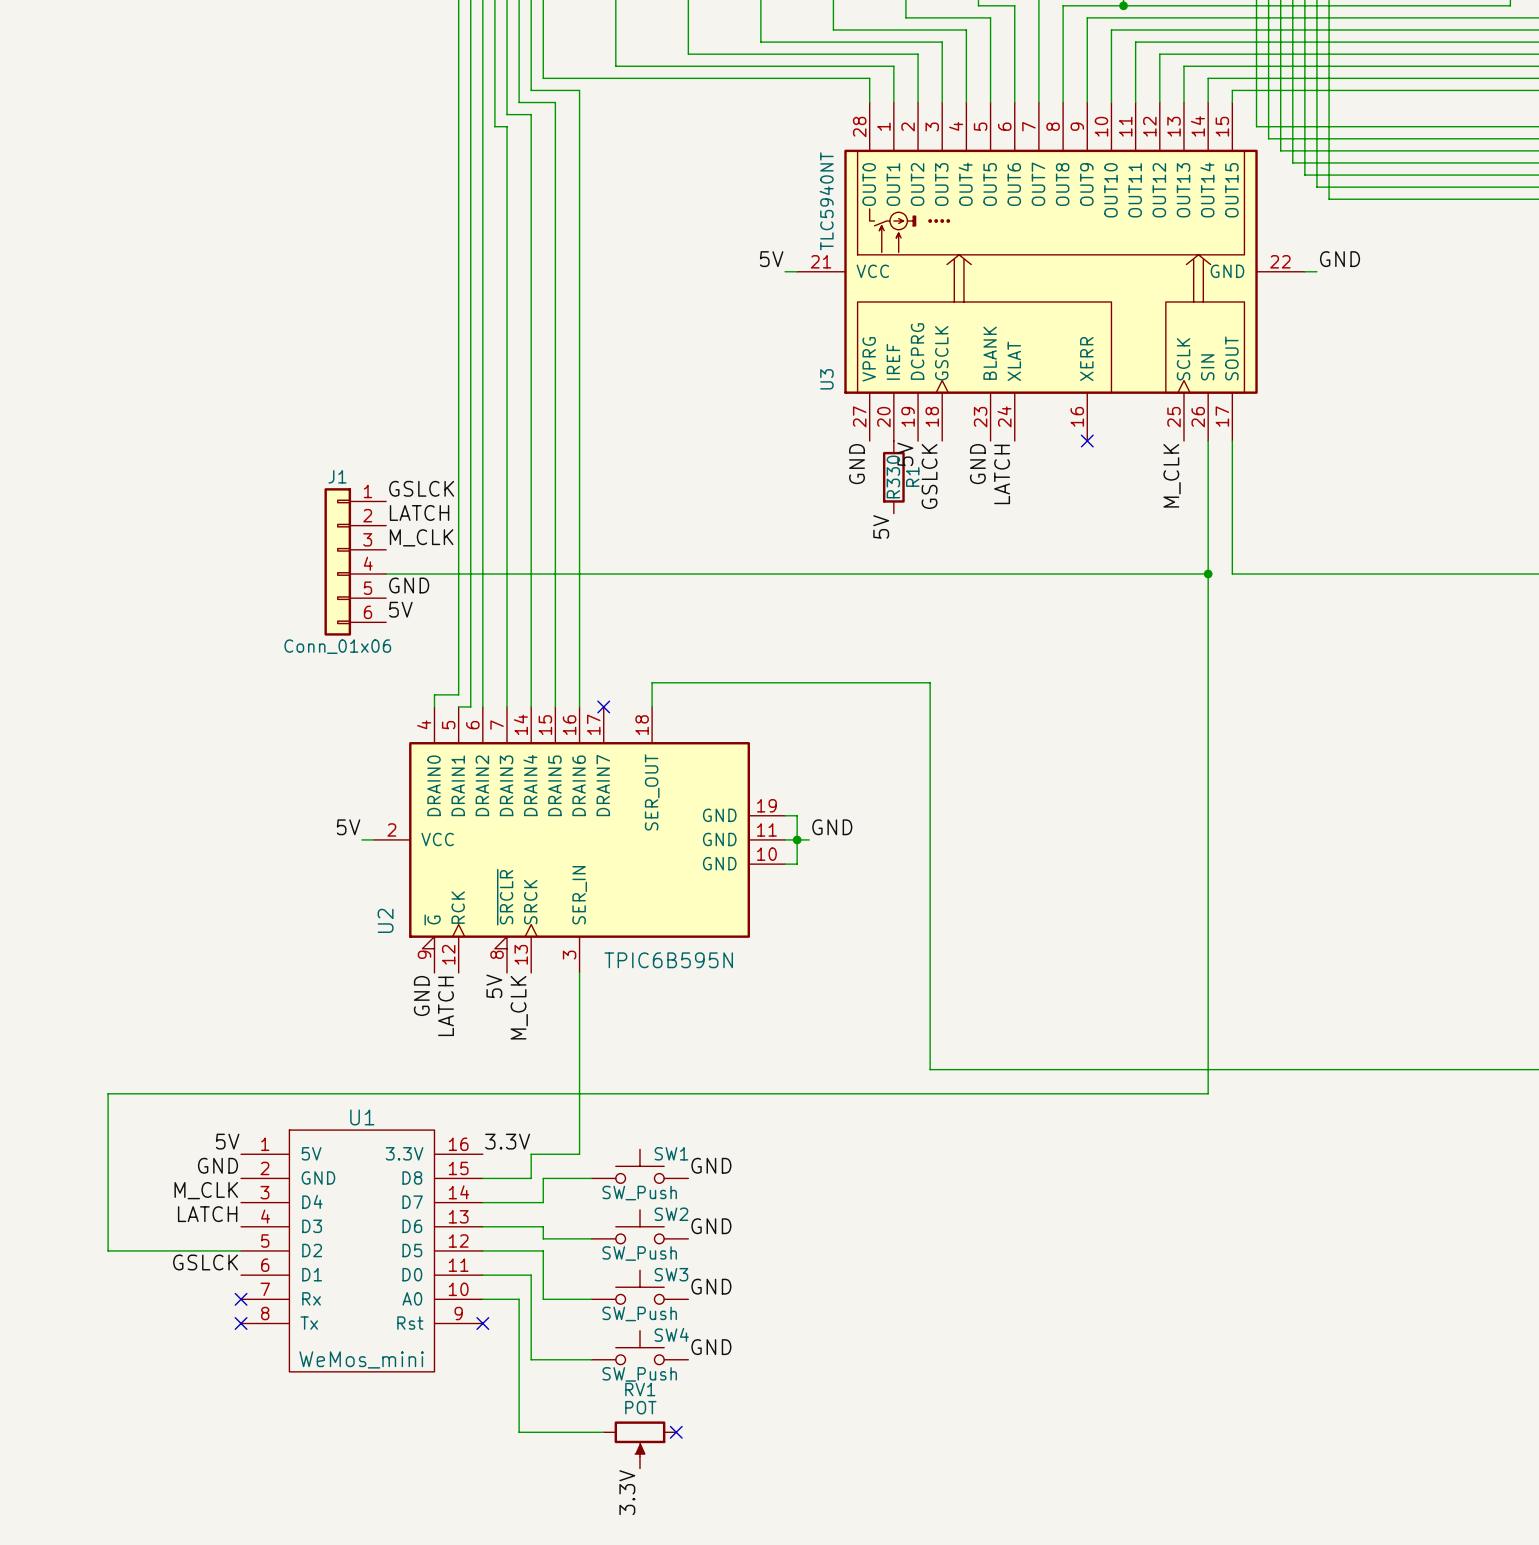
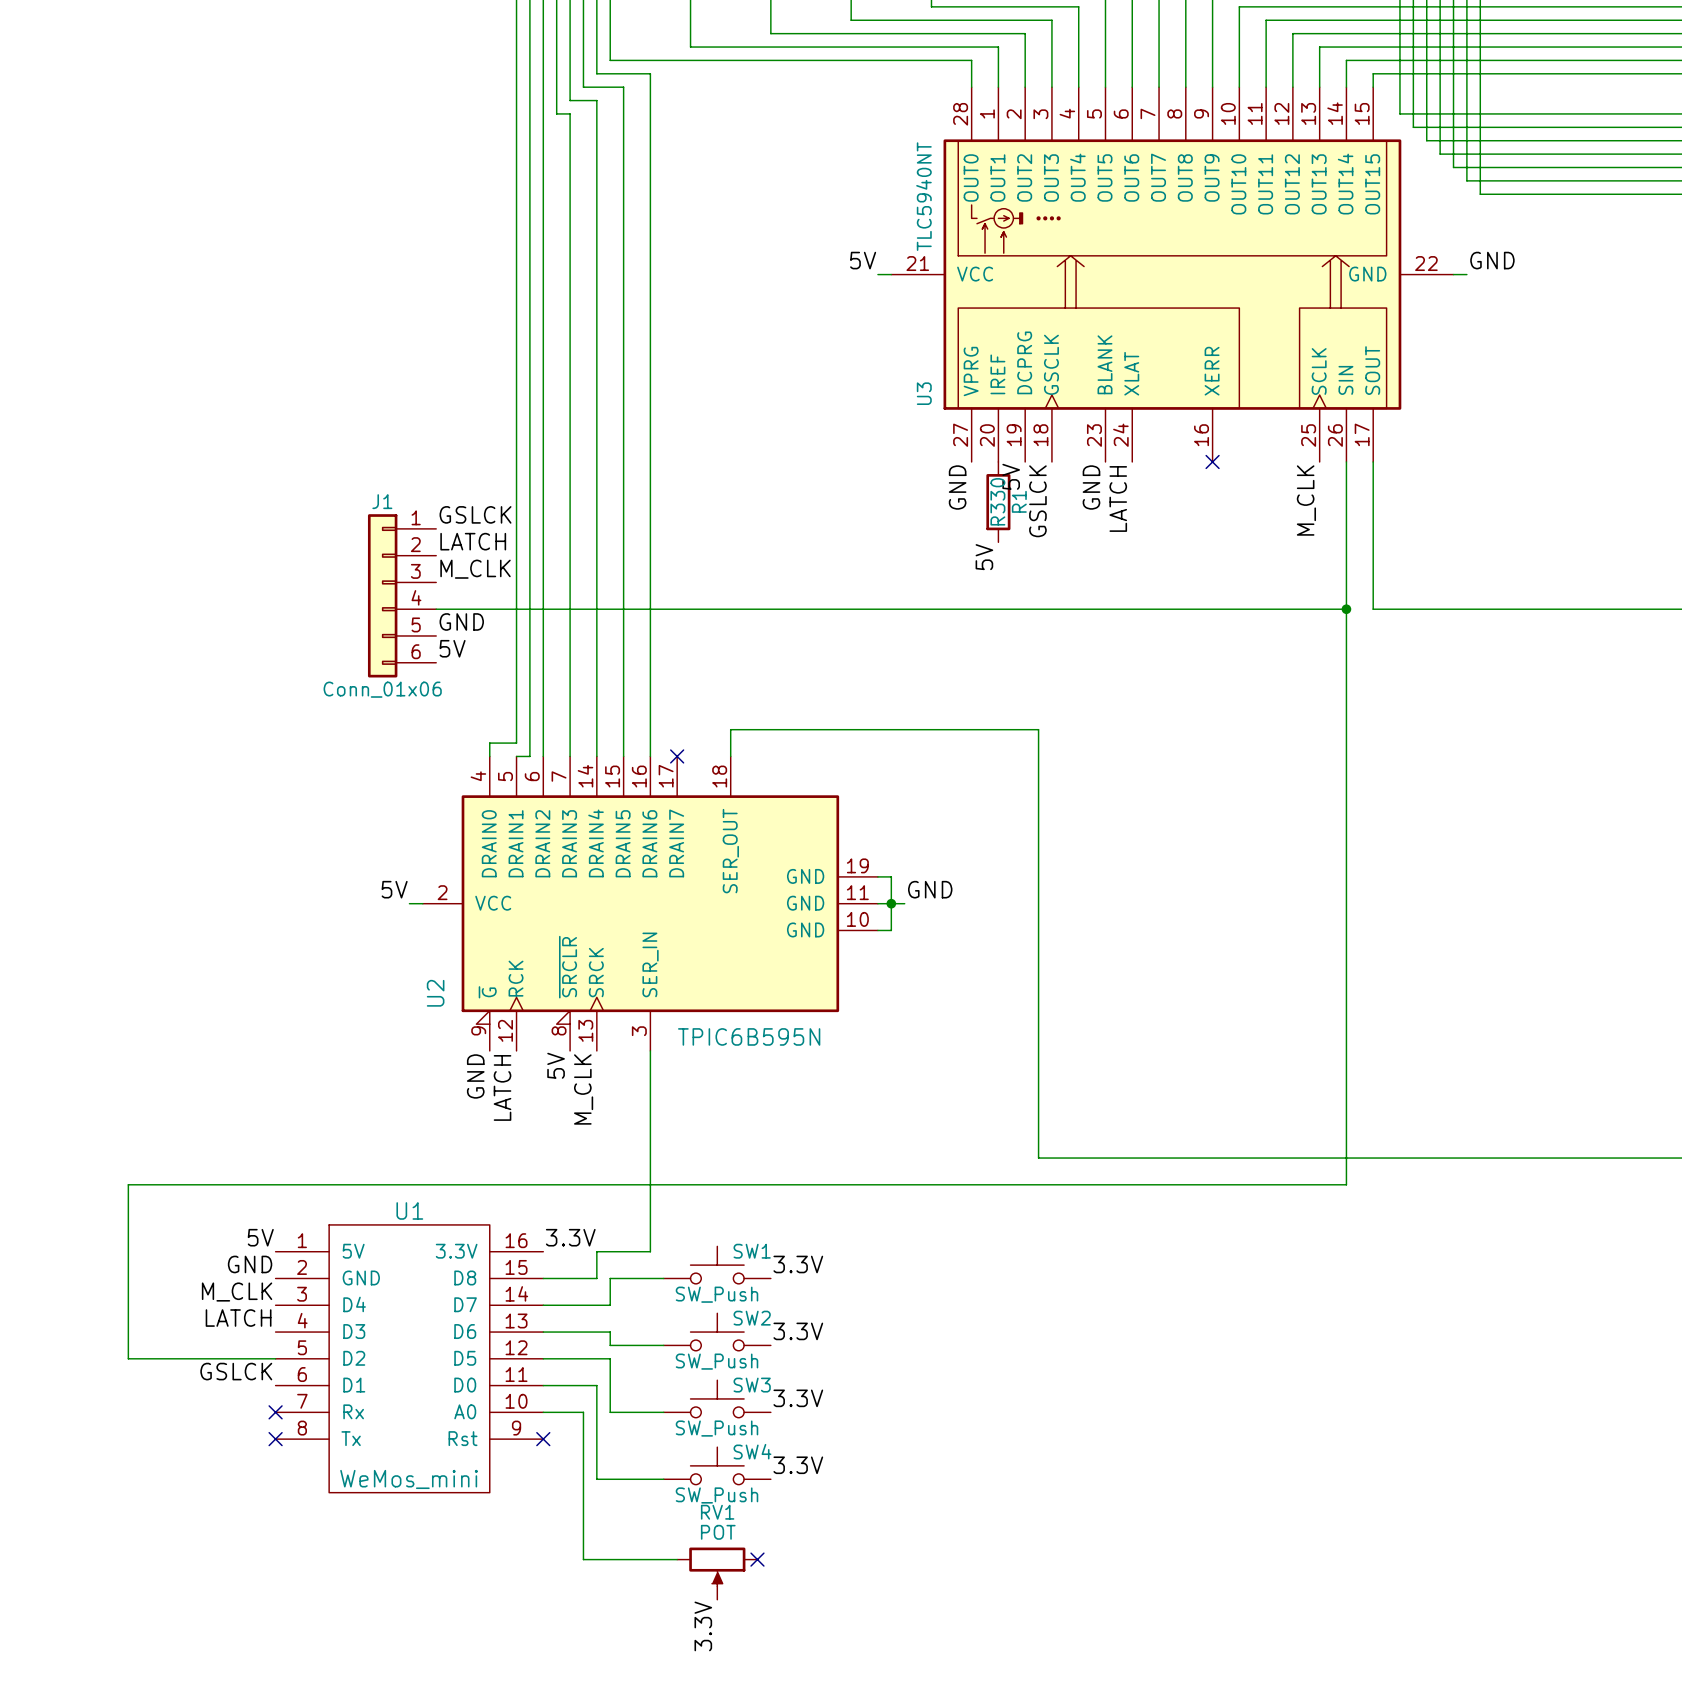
label: GND (711, 1165) -> 3.3V (798, 1264)
label: GND (711, 1226) -> 3.3V (798, 1331)
label: GND (711, 1286) -> 3.3V (798, 1398)
label: GND (711, 1347) -> 3.3V (798, 1465)

